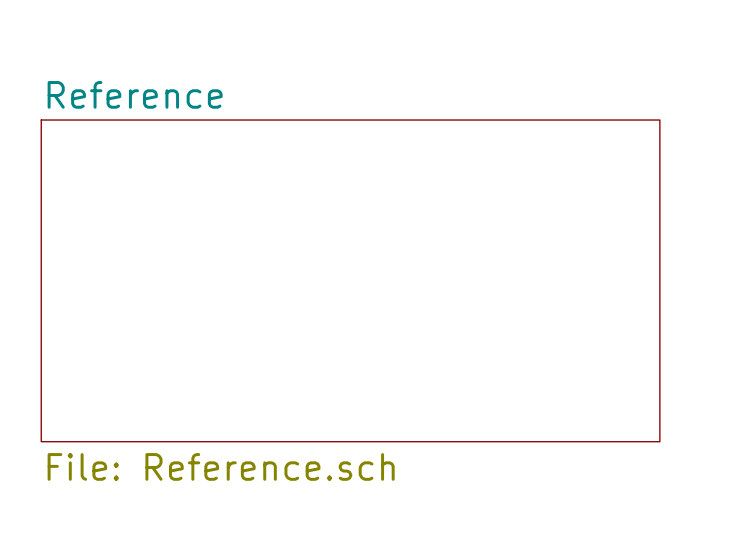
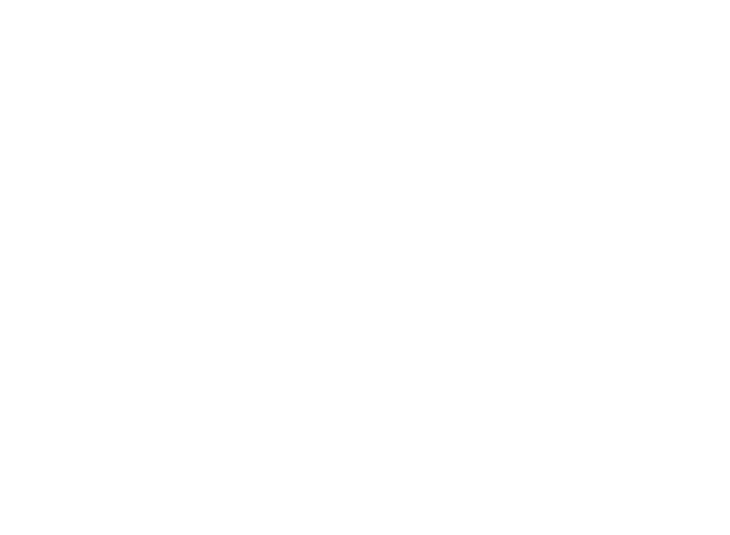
sheet Reference: File: Reference.sch (350, 280) -> none

